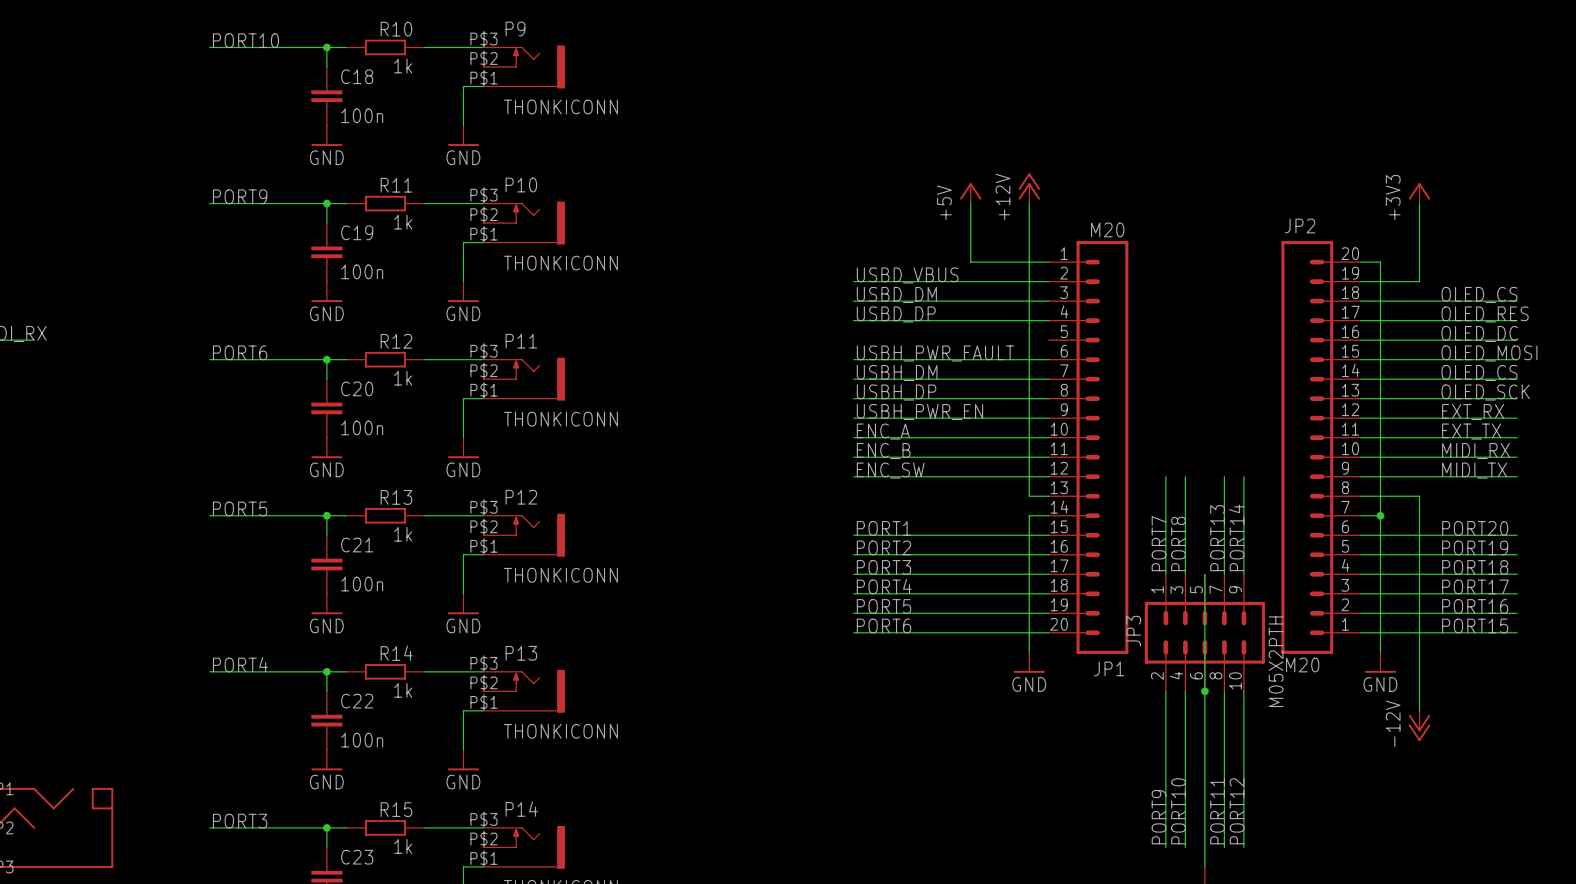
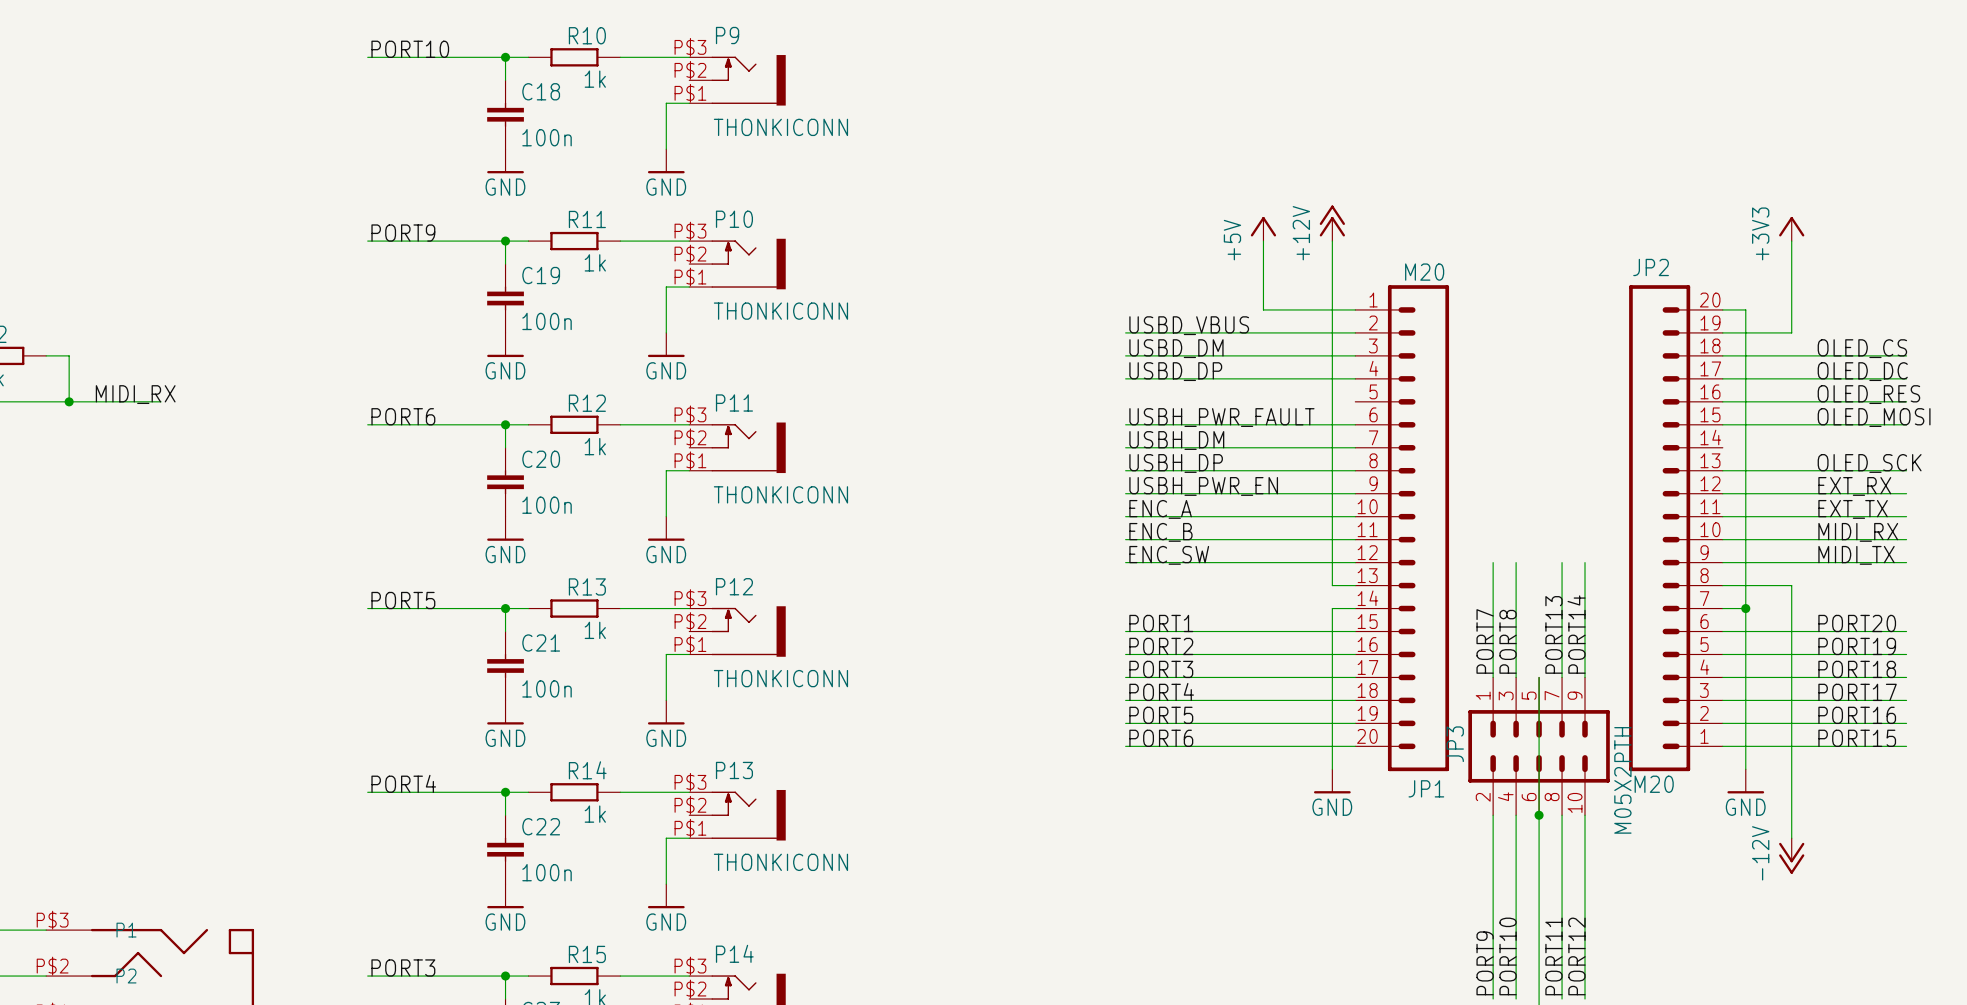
label: OLED_RES (1485, 314) -> OLED_DC (1862, 371)
label: OLED_DC (1479, 333) -> OLED_RES (1868, 394)
label: OLED_CS (1479, 372) -> none
wire: (1360, 379) (1517, 379) -> none

